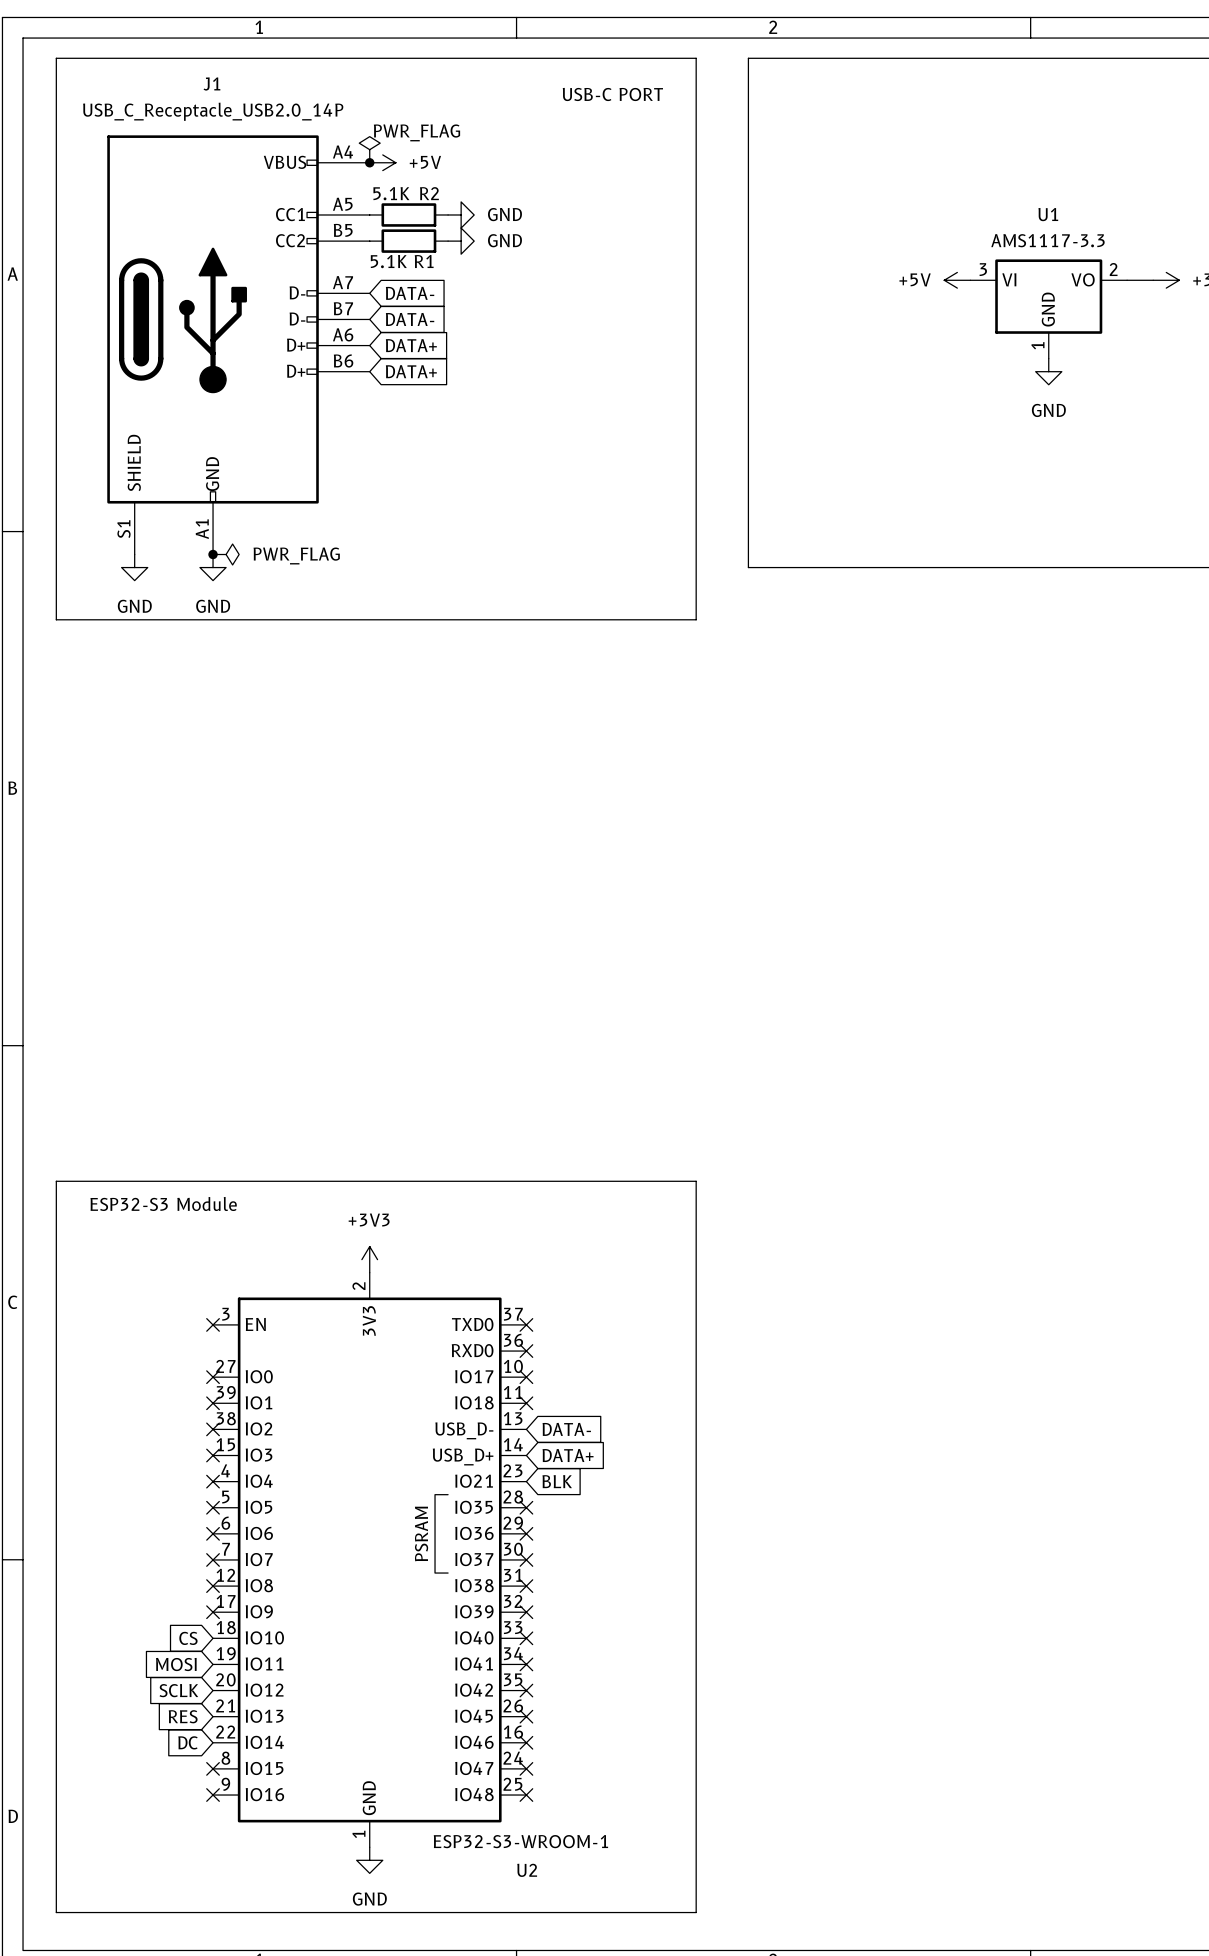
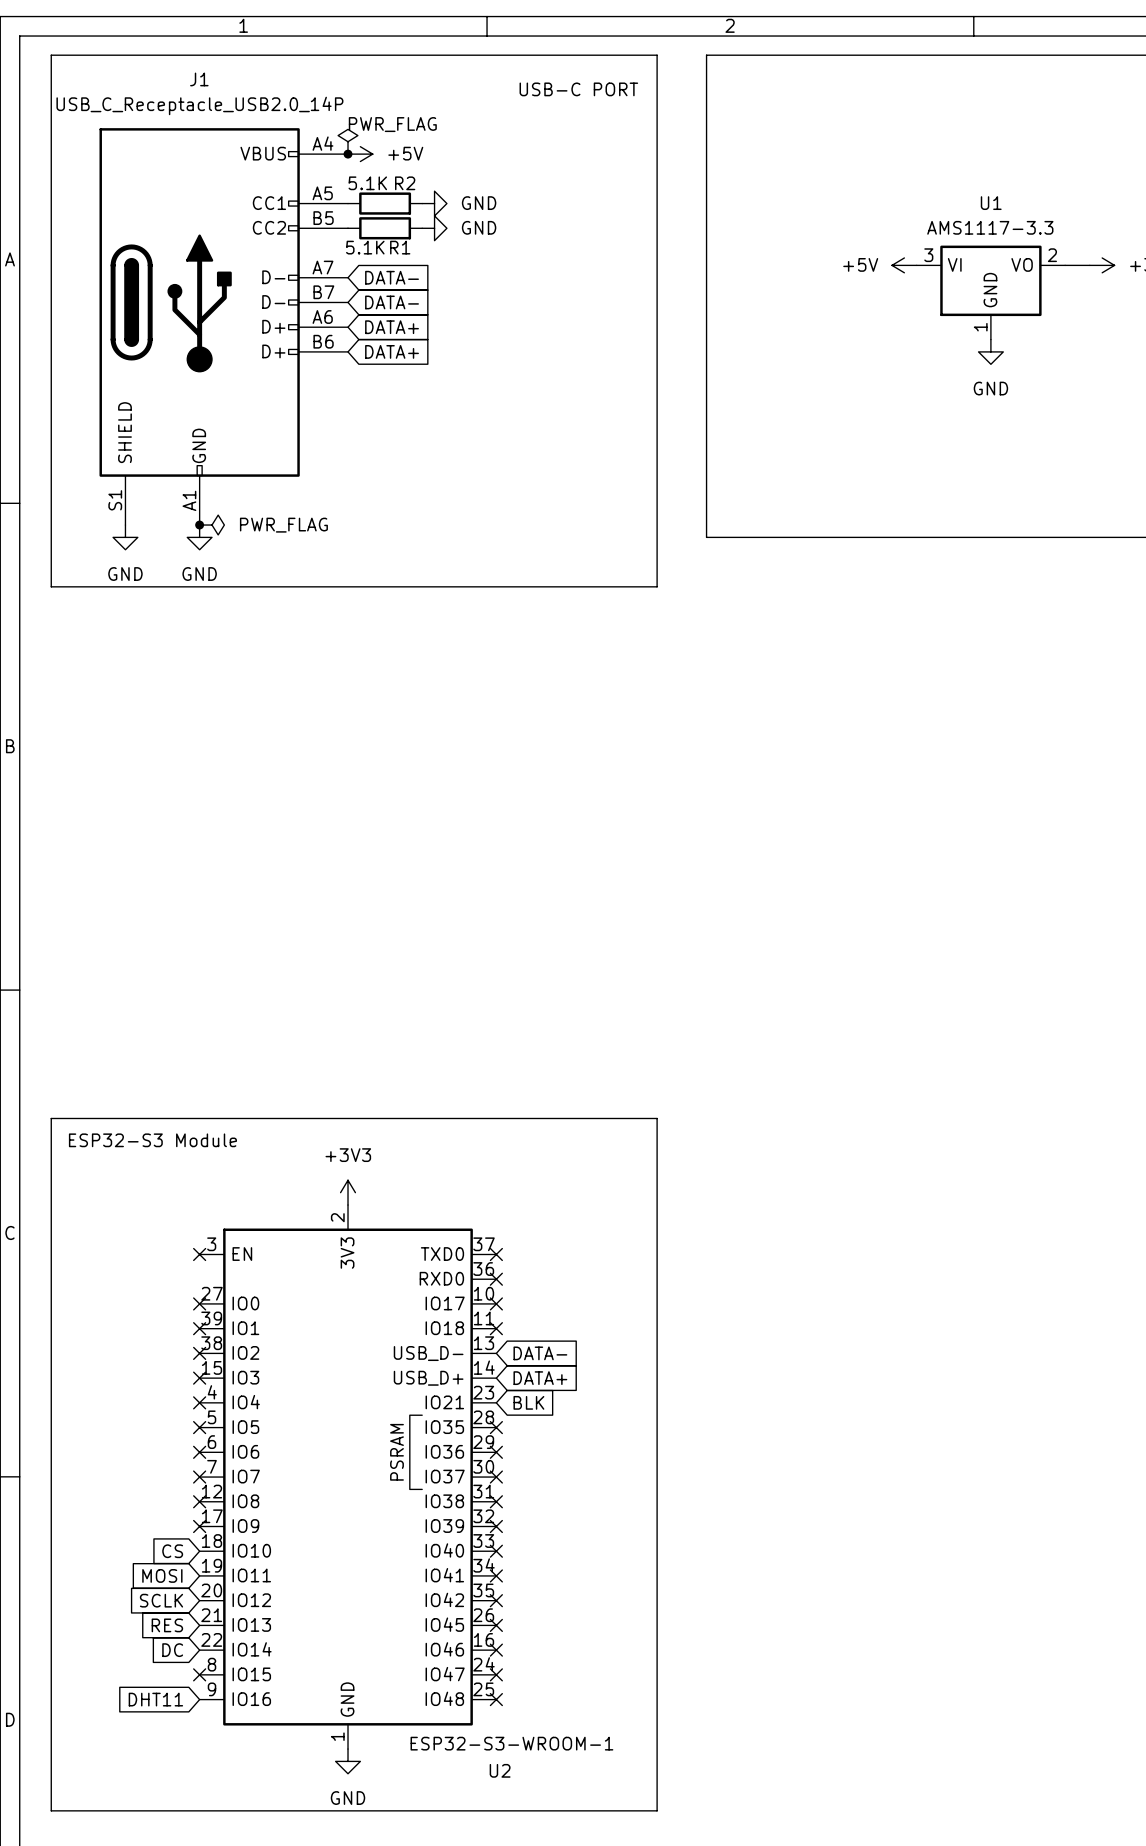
global label: none -> DHT11 (155, 1699)
no-connect mark: (213, 1795) -> none

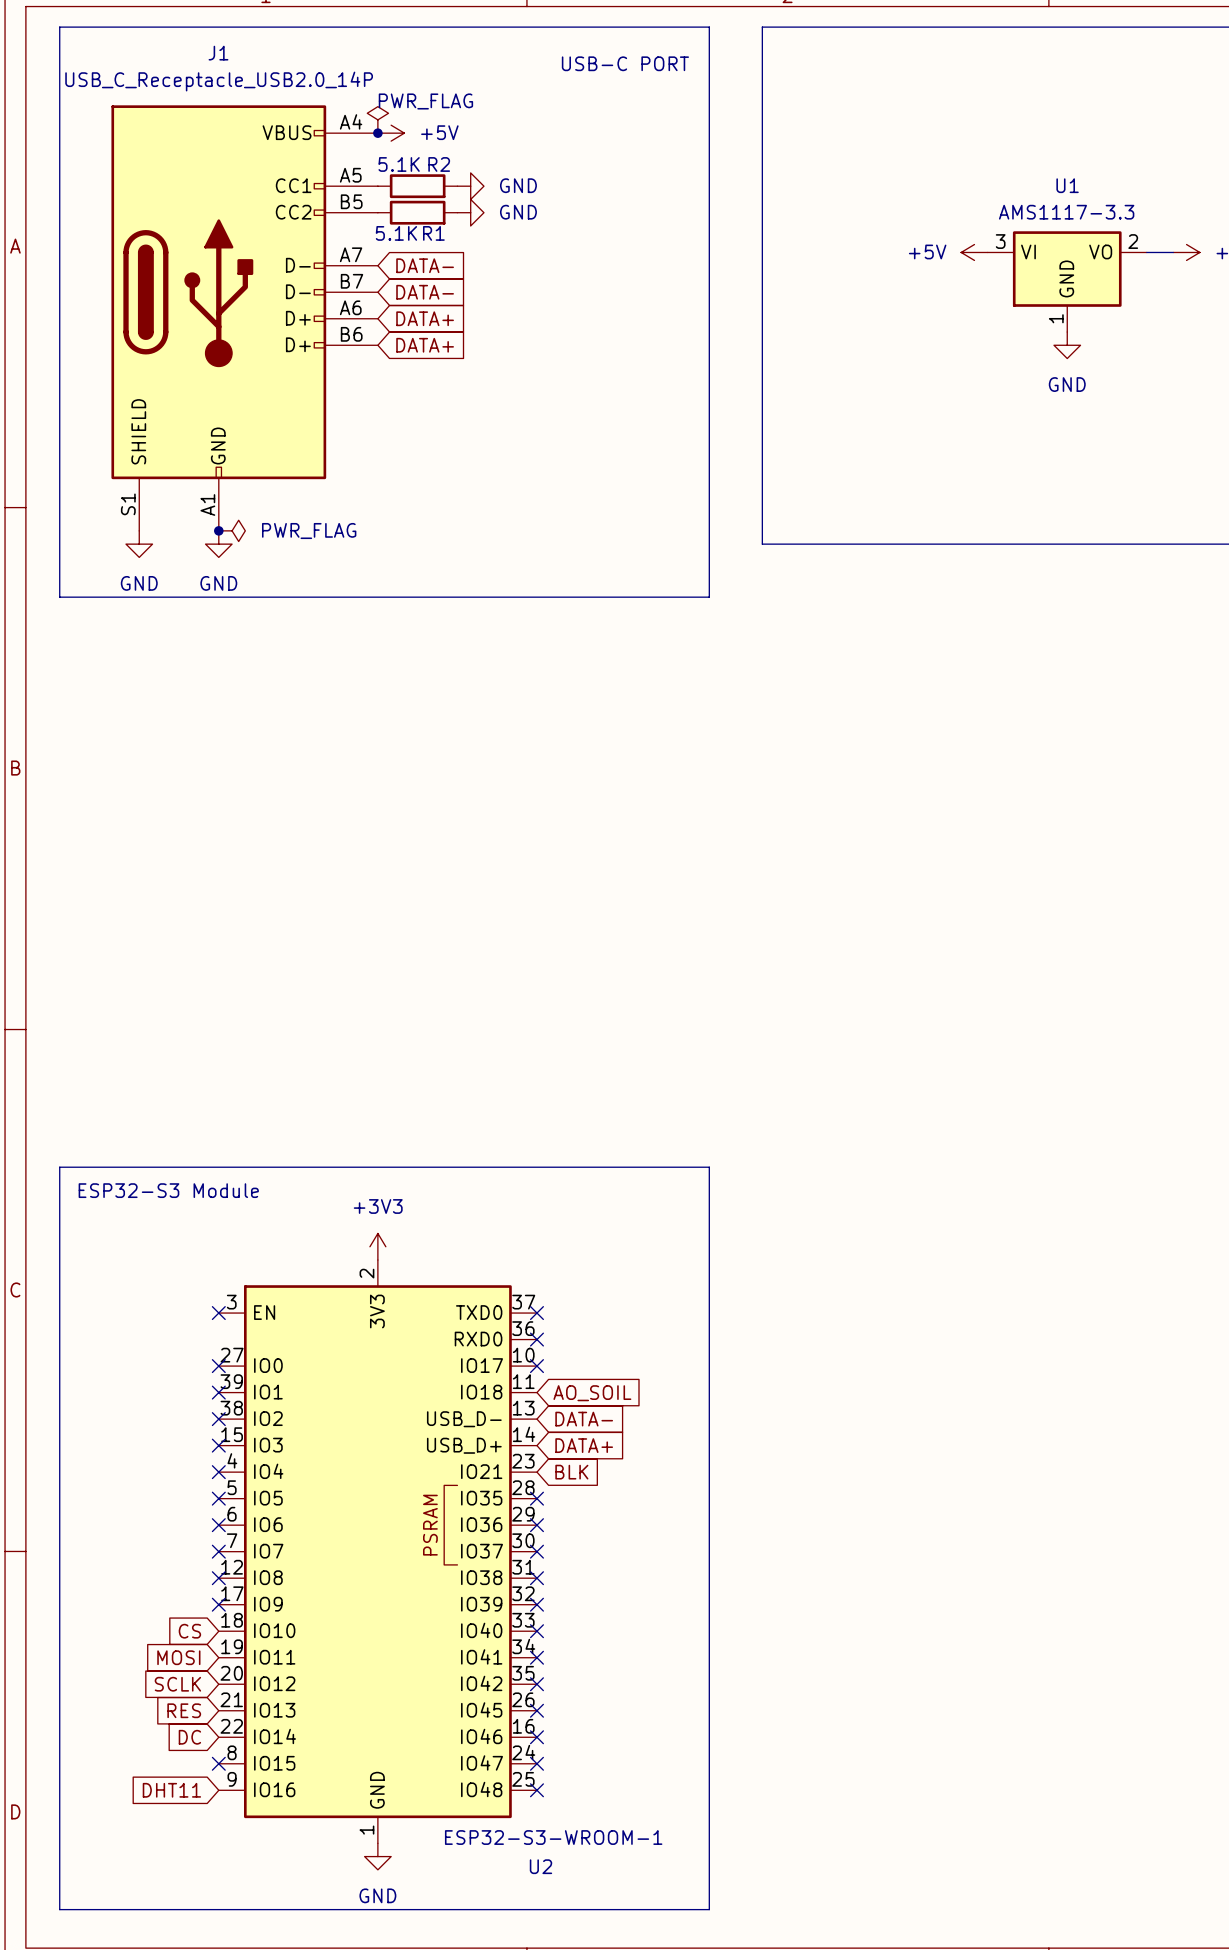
no-connect mark: (496, 1328) -> none
global label: none -> AO_SOIL (592, 1393)

